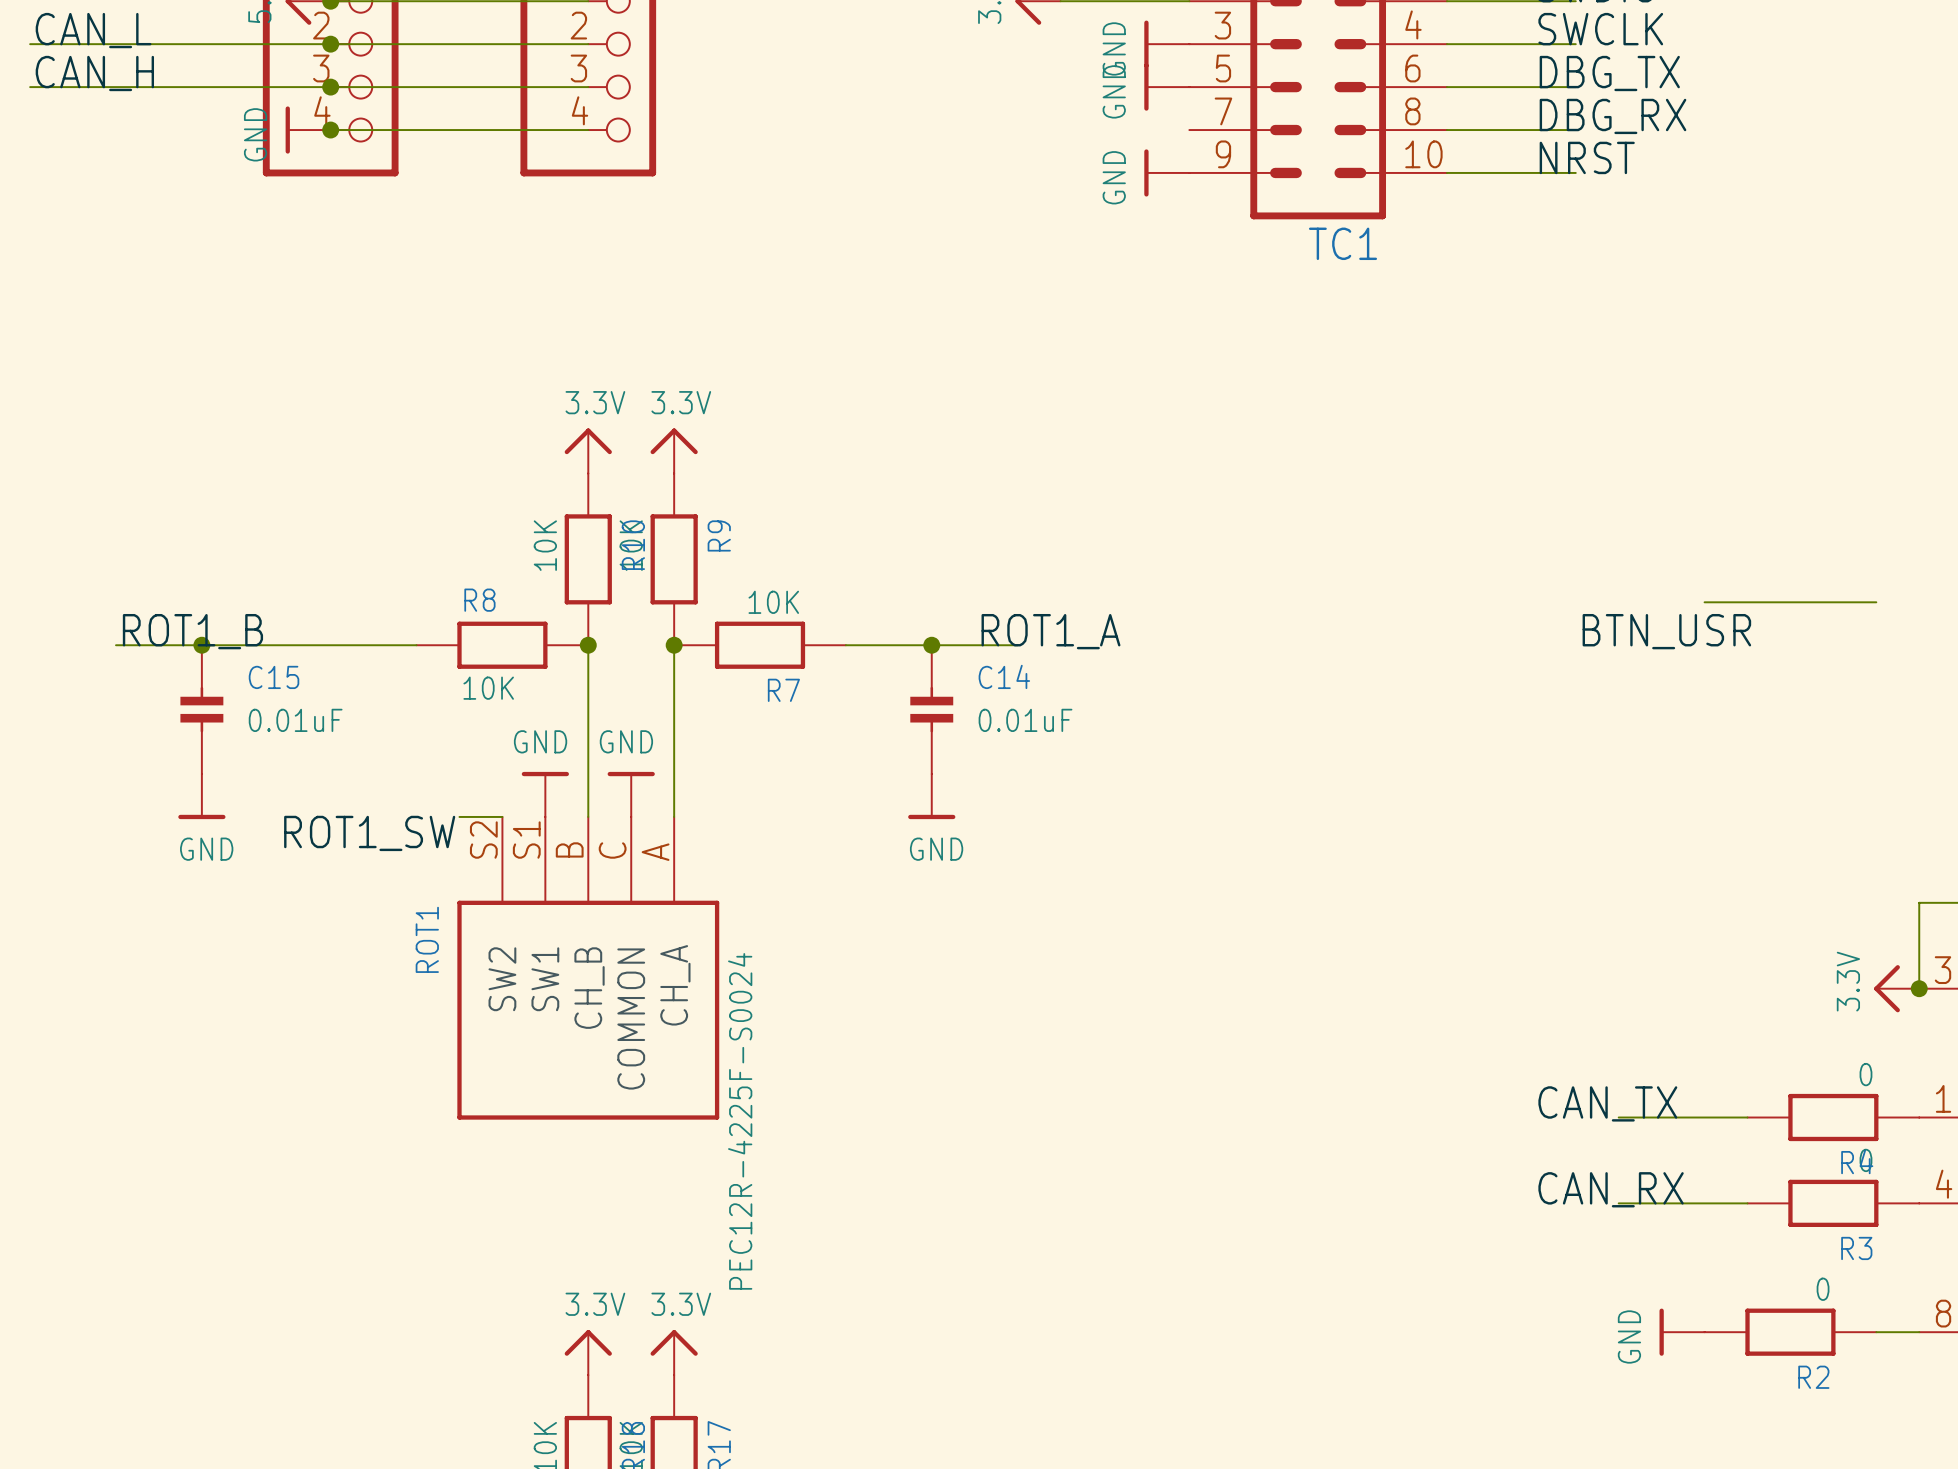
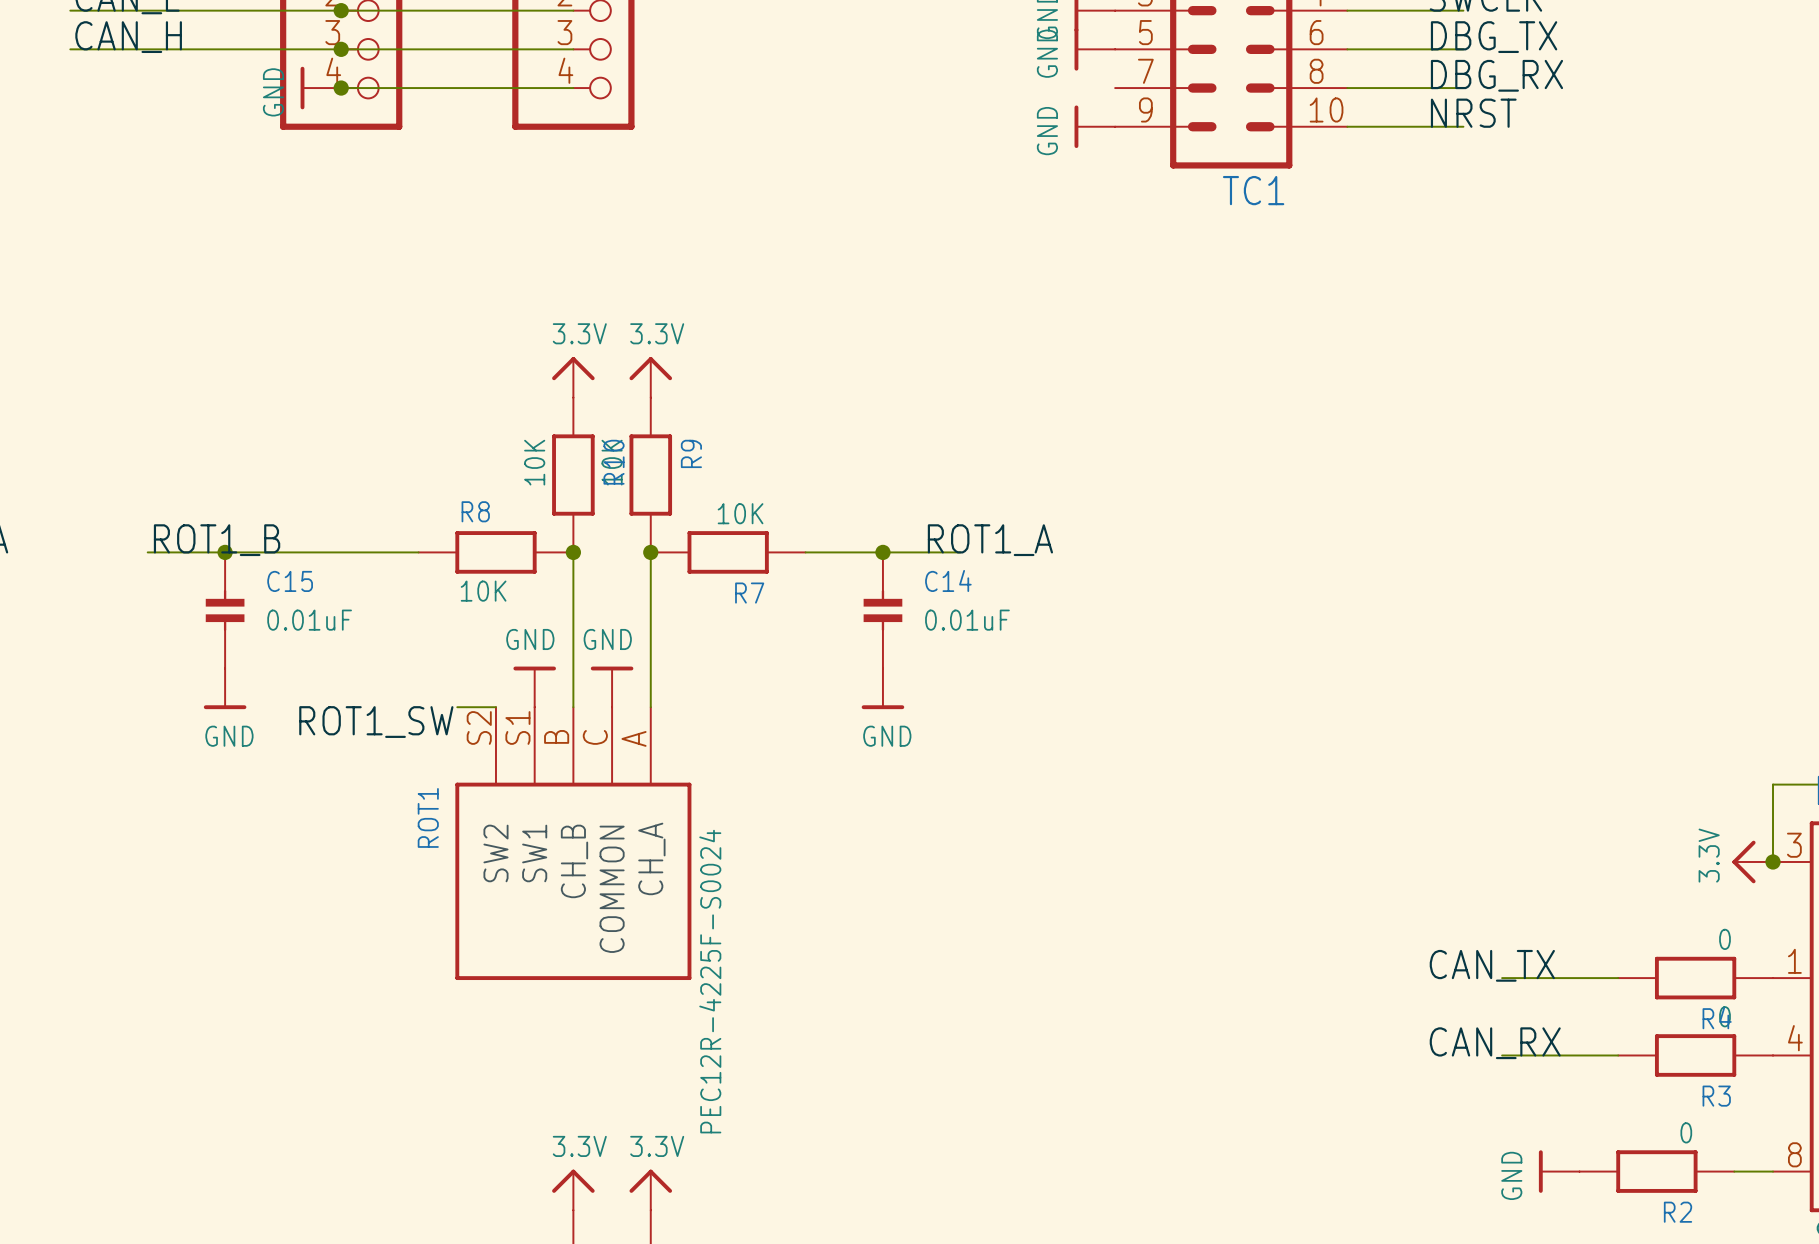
wire: (1704, 602) (1876, 602) -> none
label: BTN_USR (1666, 631) -> none

